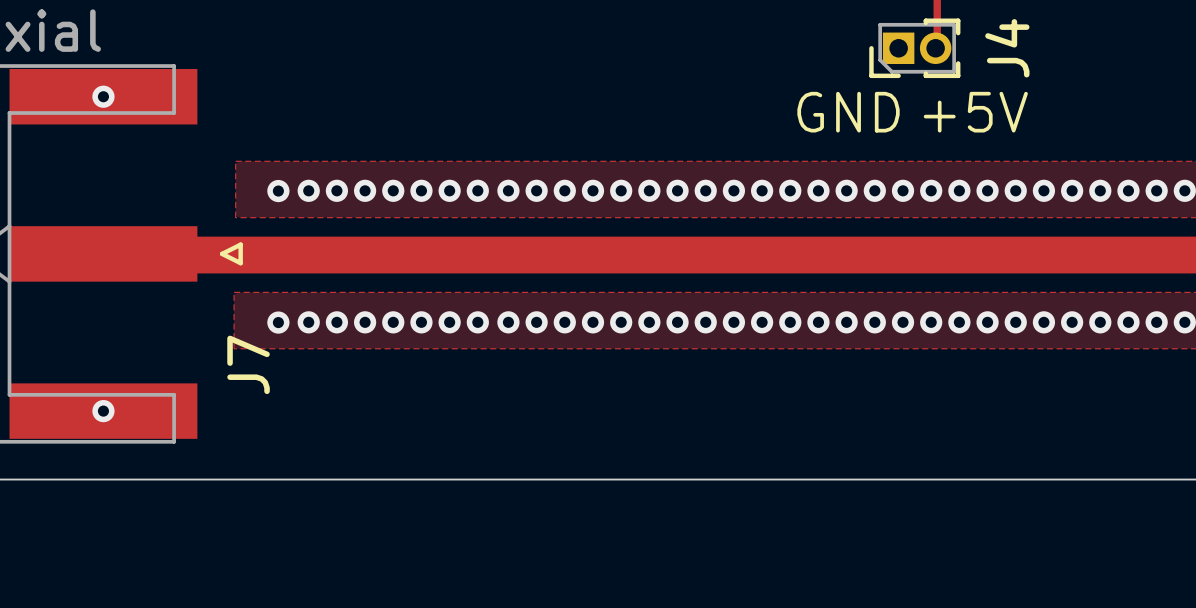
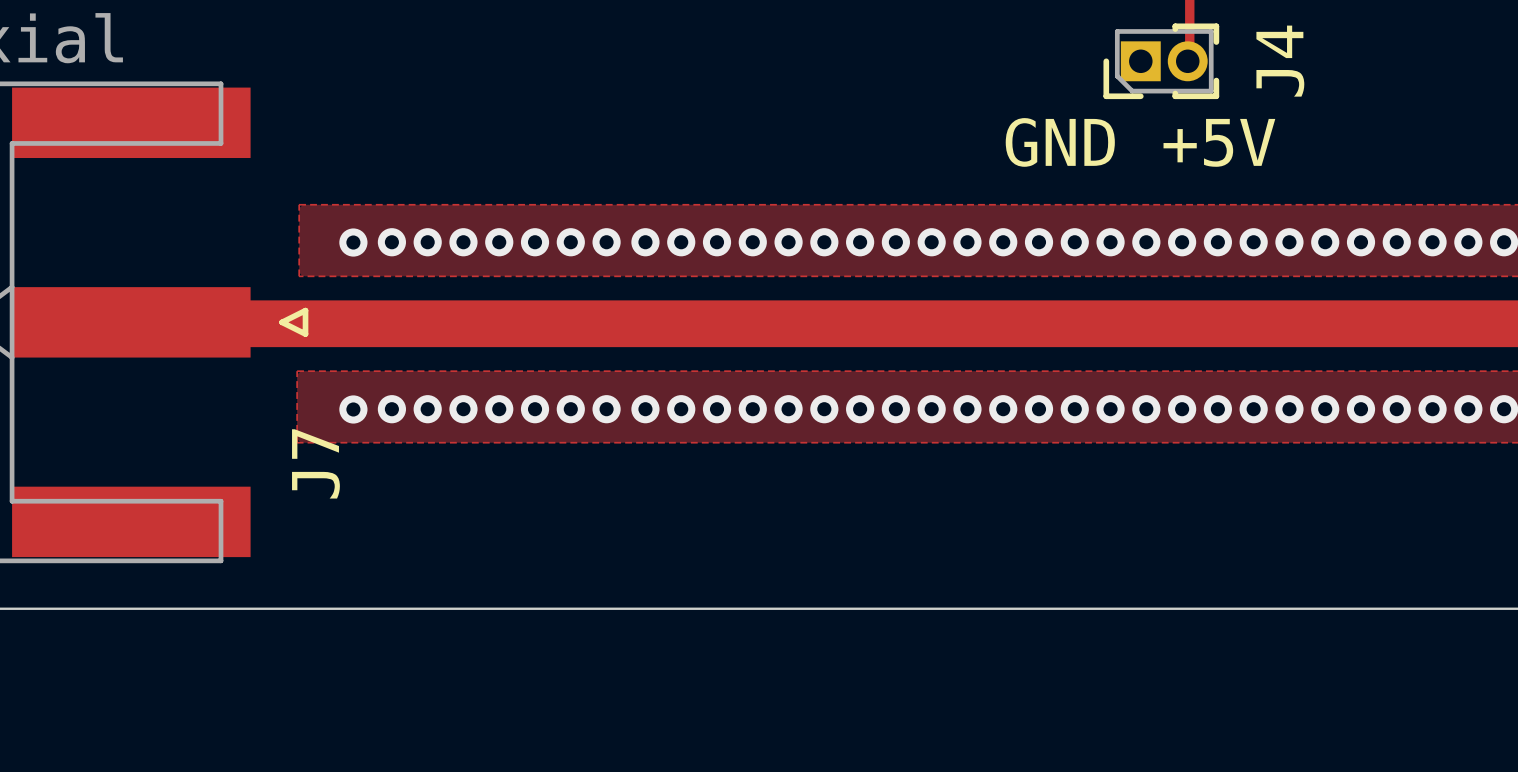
via: (103, 96) -> none
via: (103, 411) -> none

